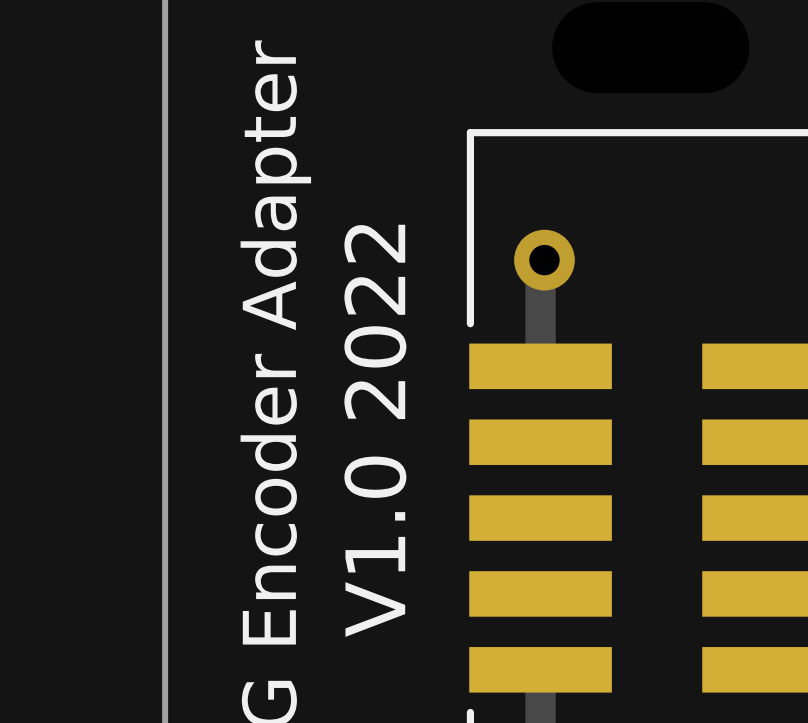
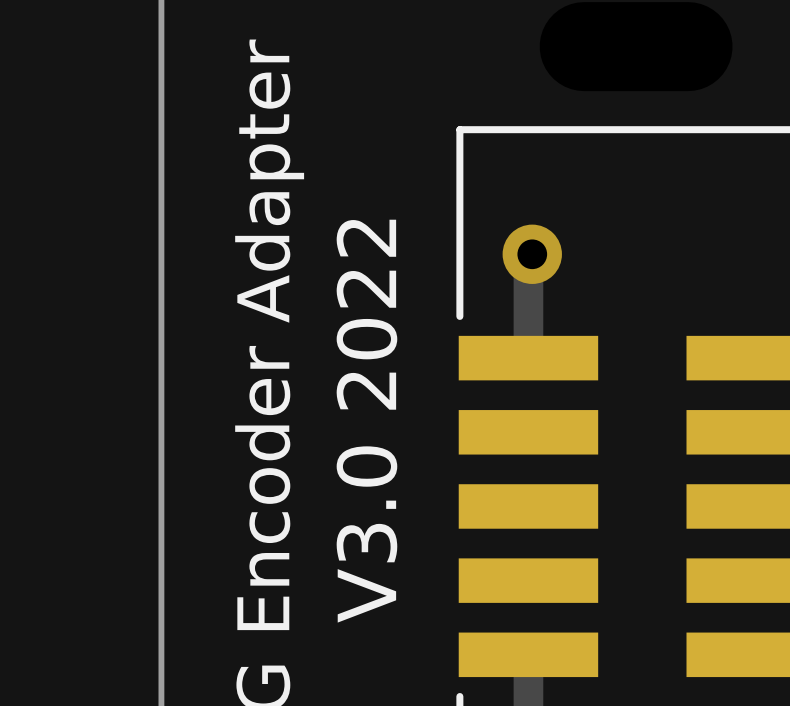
text: V1.0 2022 (375, 430) -> V3.0 2022 (366, 421)

